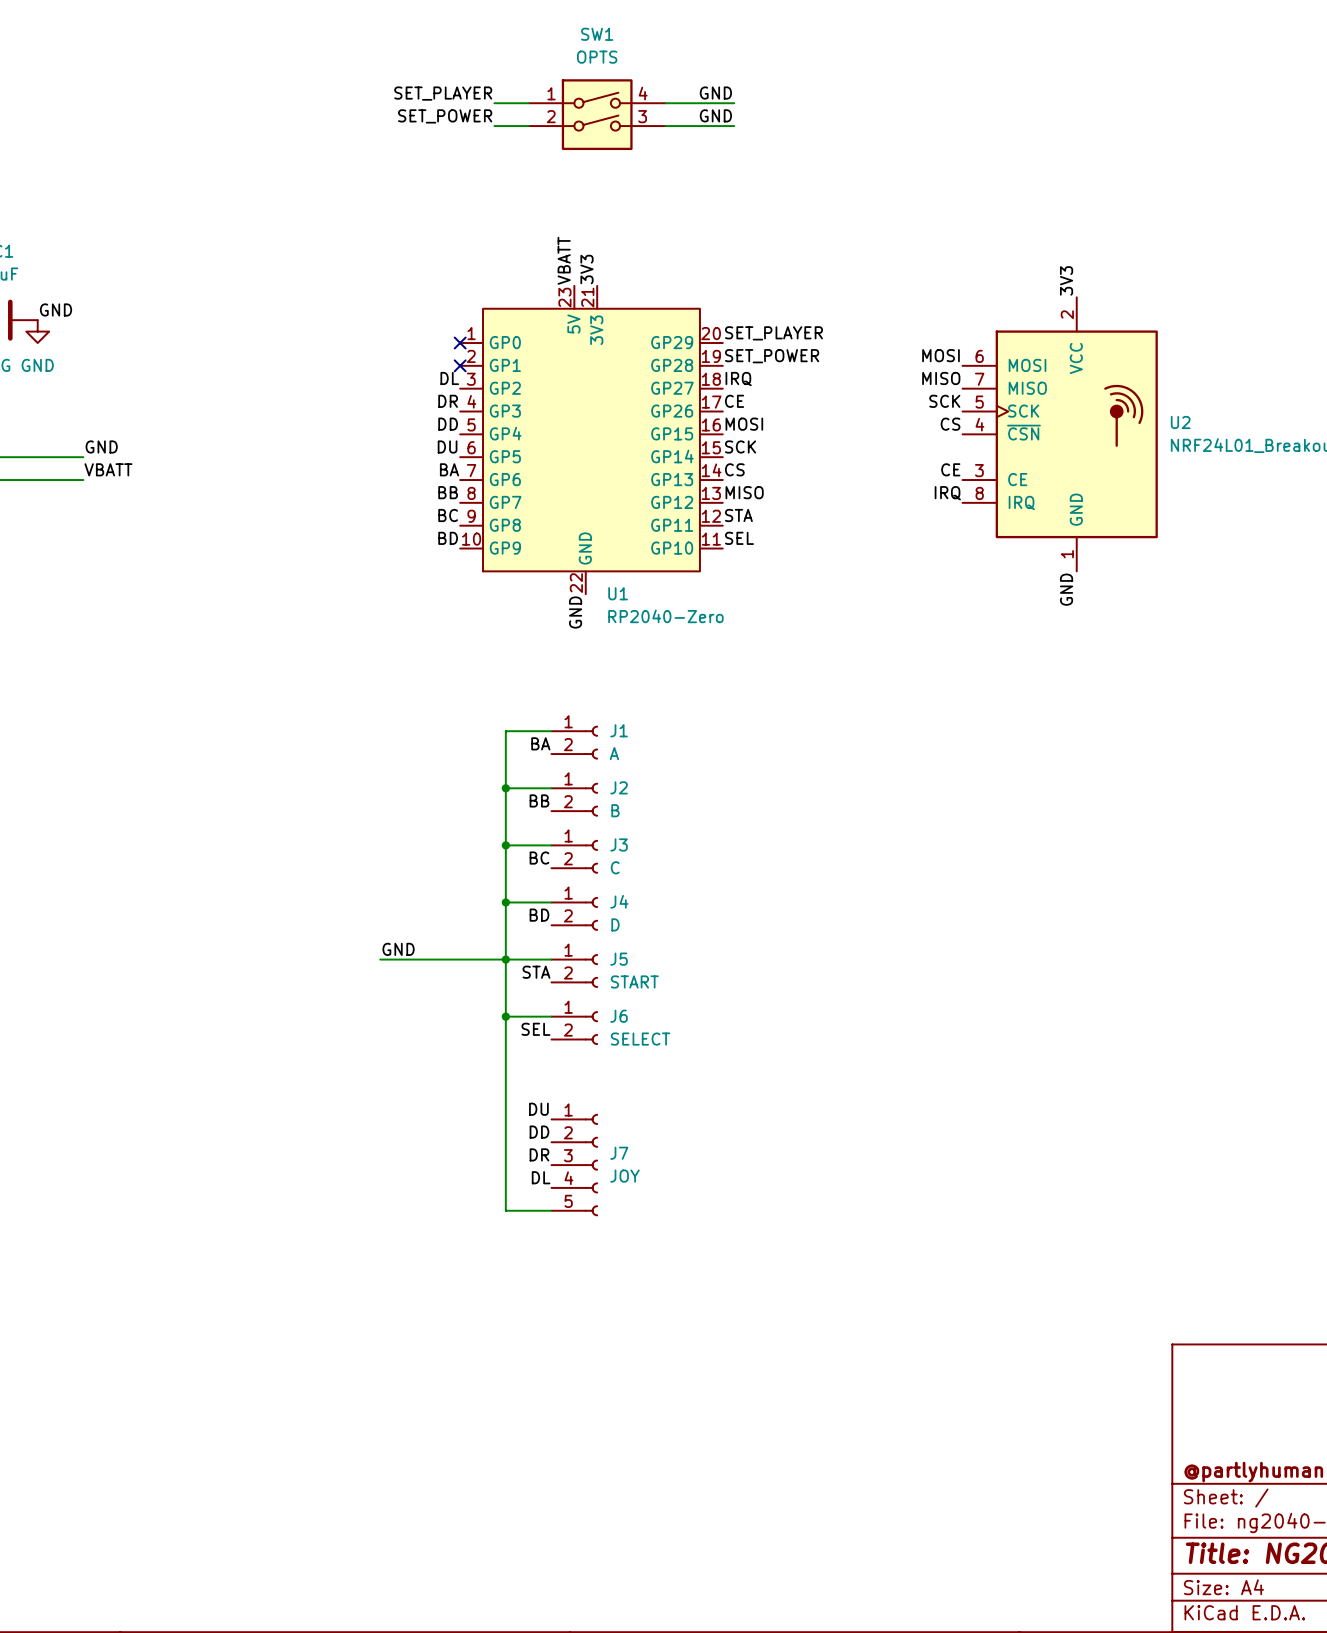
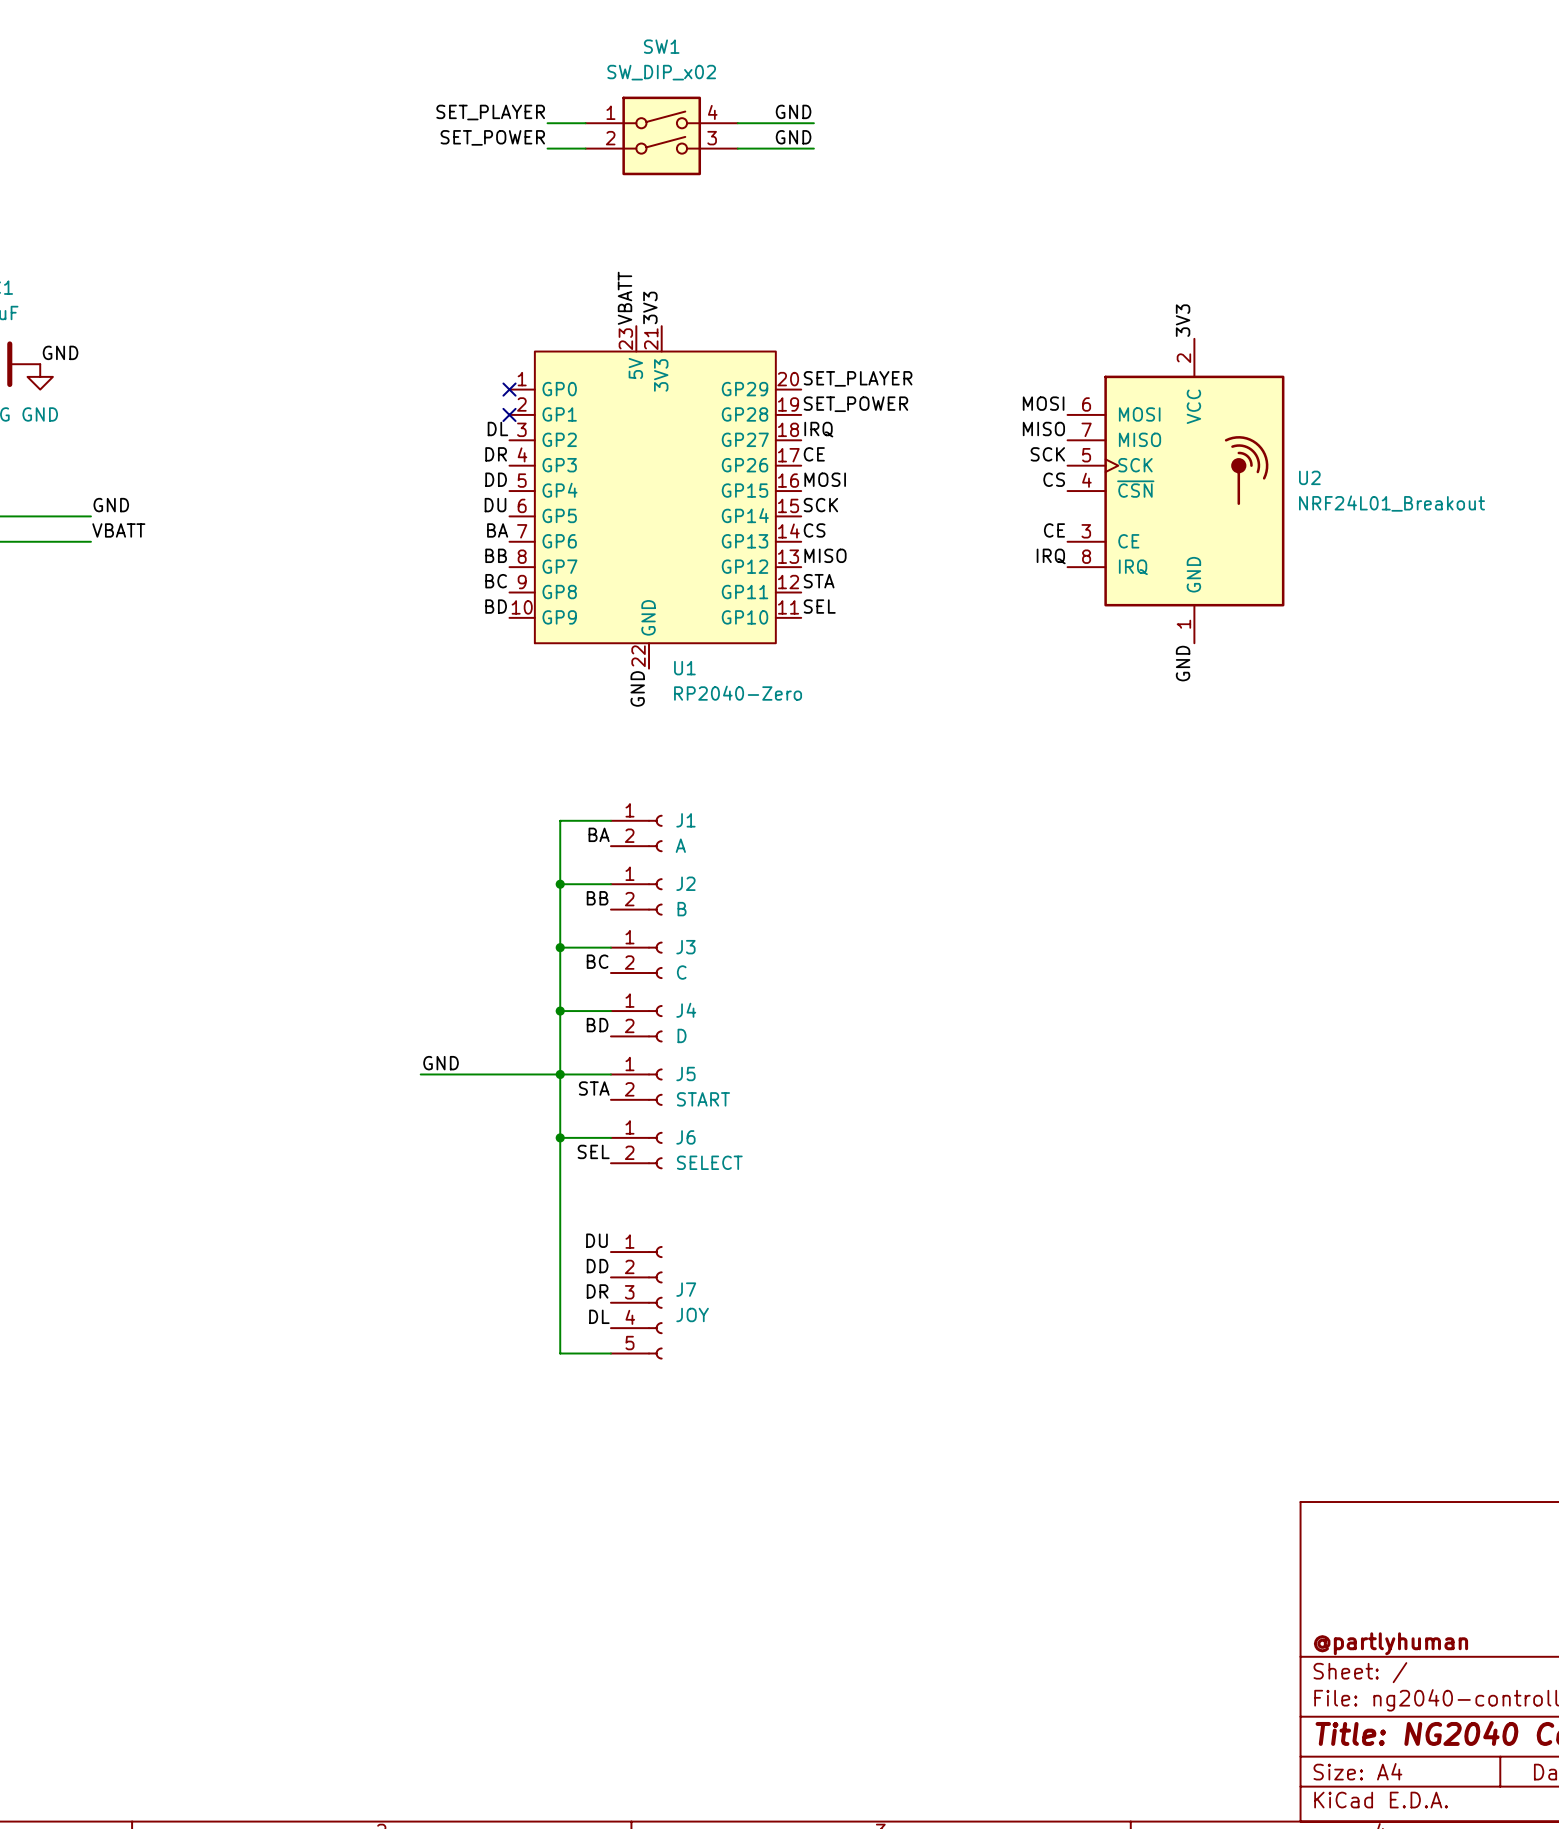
SW1 value: OPTS (597, 57) -> SW_DIP_x02 (661, 72)

